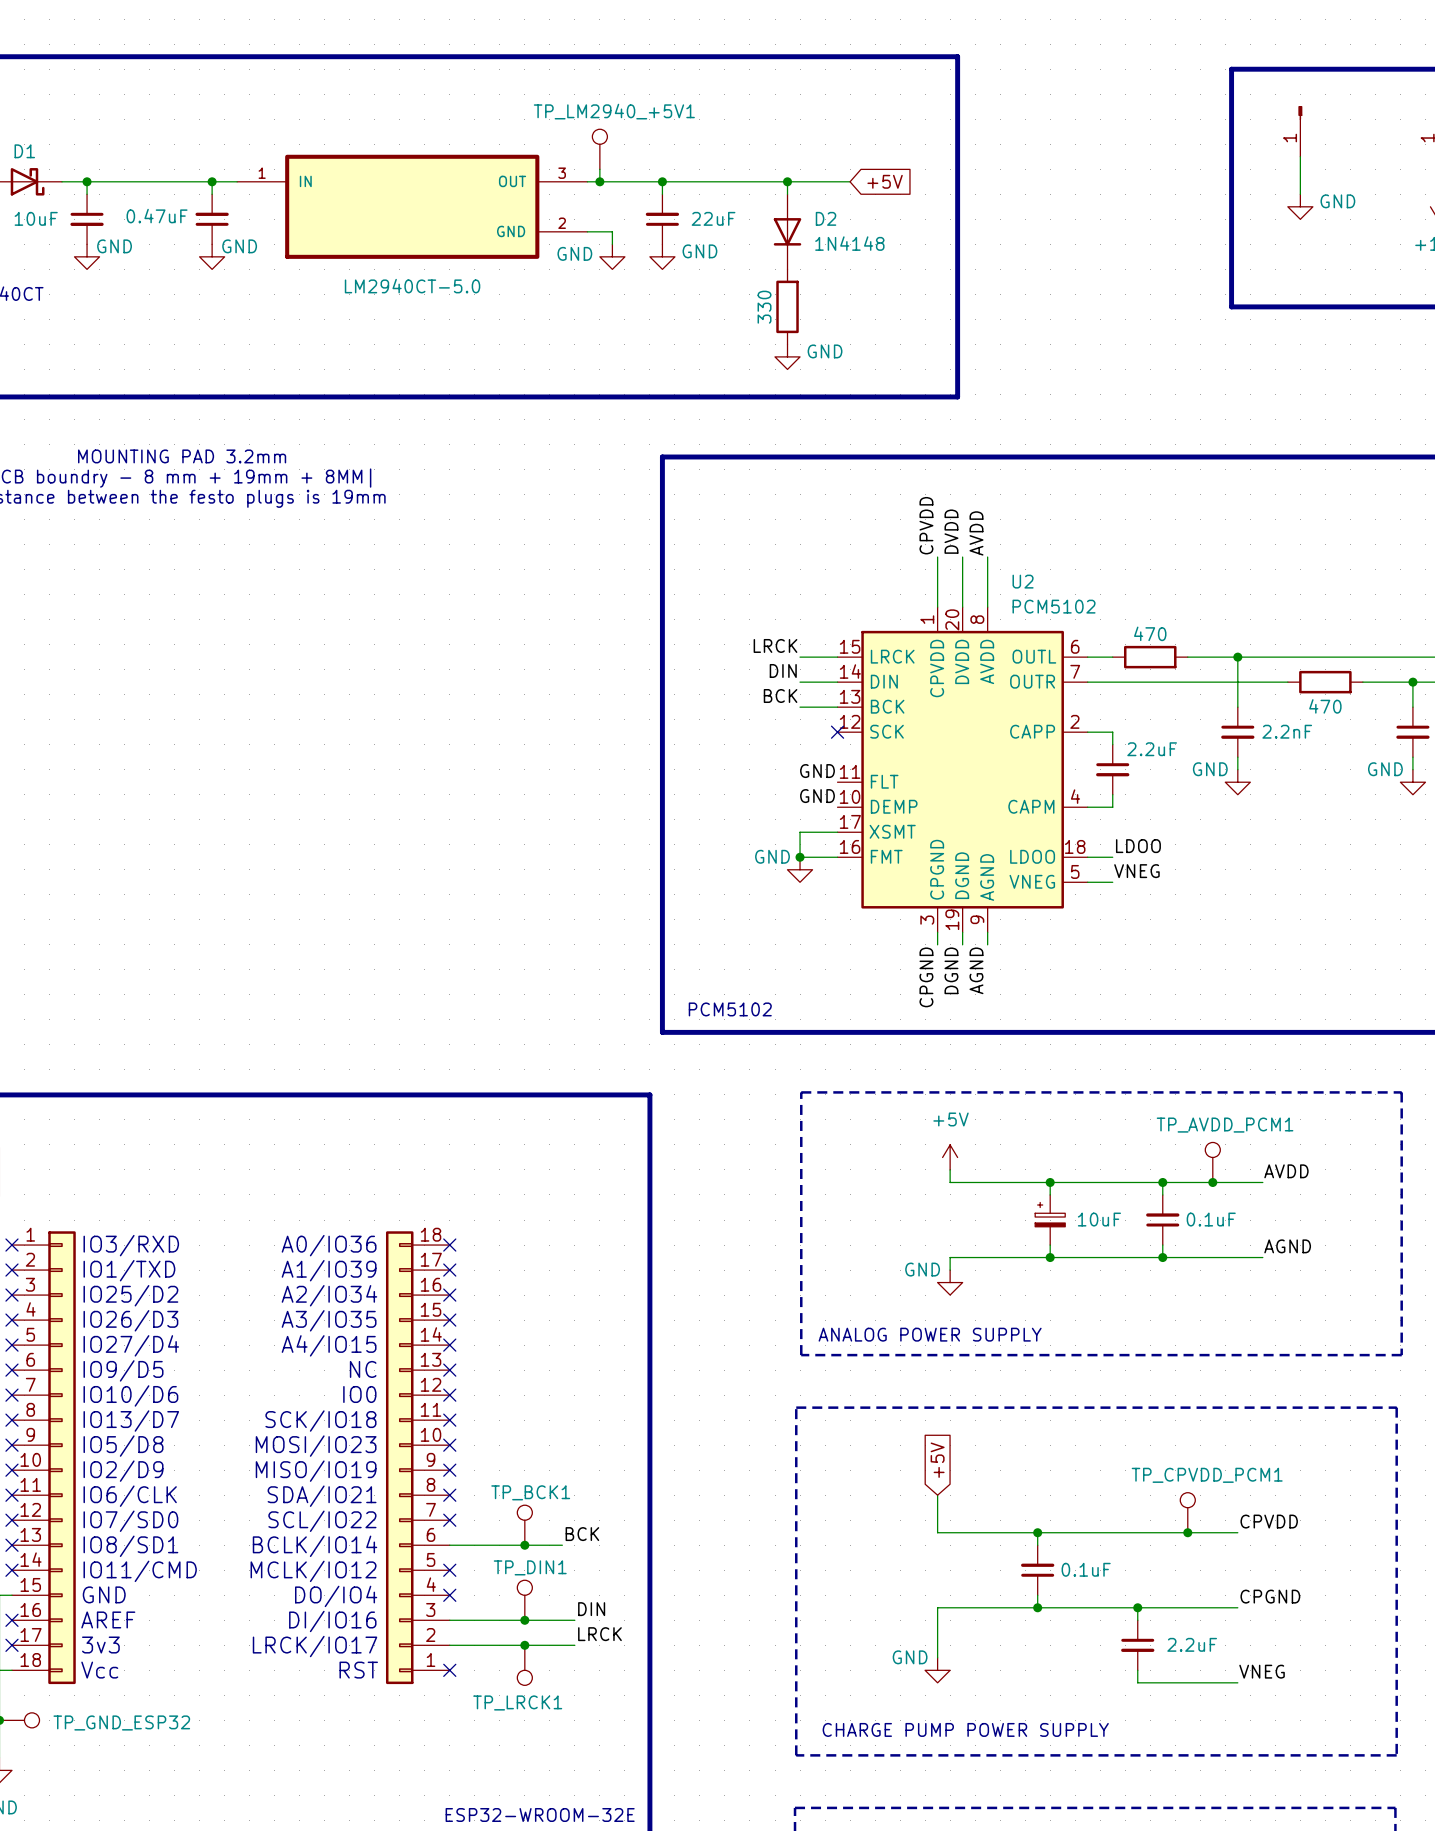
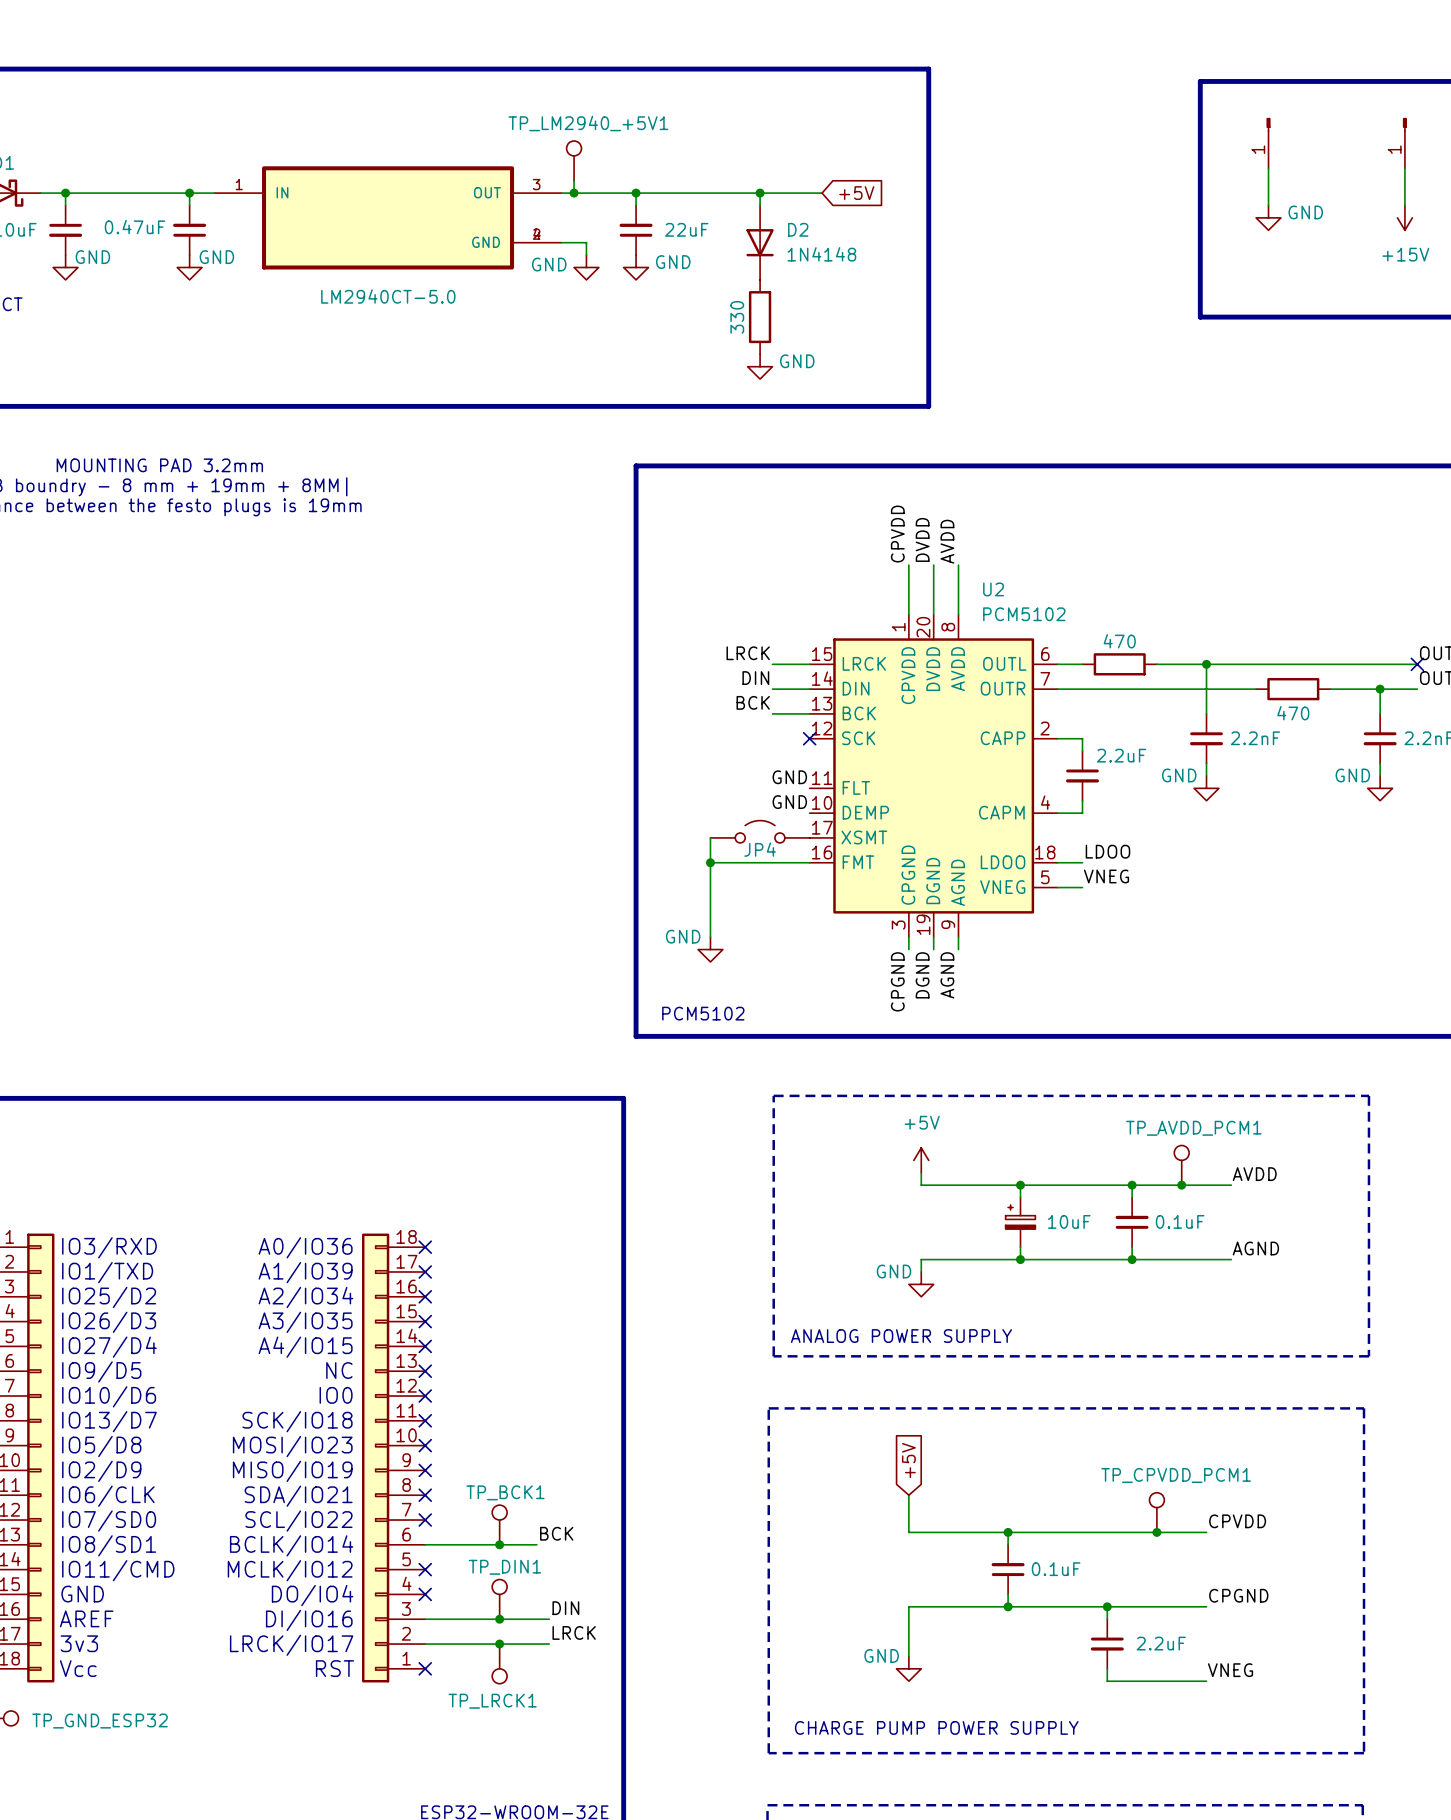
part symbol: [237, 154, 588, 259] -> [214, 166, 562, 270]
JP4: none -> (760, 831)
wire: none -> (710, 837) (710, 937)
wire: (837, 832) (800, 832) (800, 857) -> (710, 862) (772, 862)
junction: none -> (710, 862)
junction: (800, 857) -> none
power symbol position: GND (800, 869) -> GND (710, 949)

